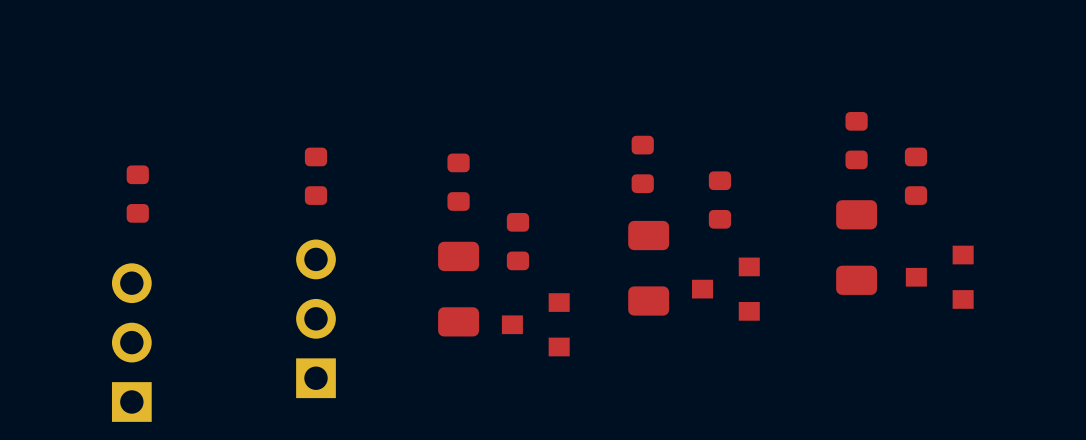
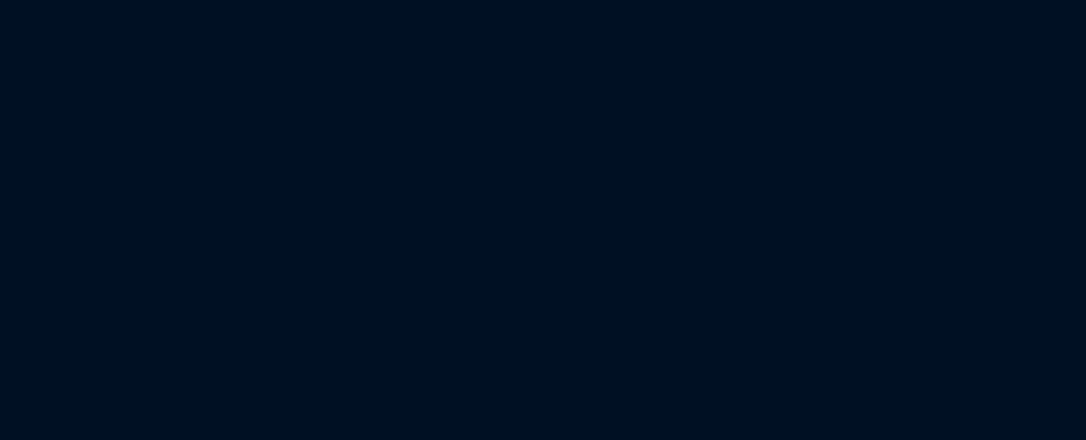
part: (856, 140) -> none
part: (642, 164) -> none
part: (315, 176) -> none
part: (915, 176) -> none
part: (458, 182) -> none
part: (137, 194) -> none
part: (719, 200) -> none
part: (517, 241) -> none
part: (856, 247) -> none
part: (648, 268) -> none
part: (939, 277) -> none
part: (458, 289) -> none
part: (725, 289) -> none
part: (315, 318) -> none
part: (535, 324) -> none
part: (131, 342) -> none

